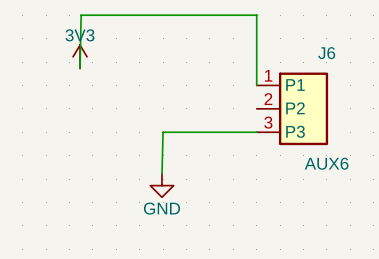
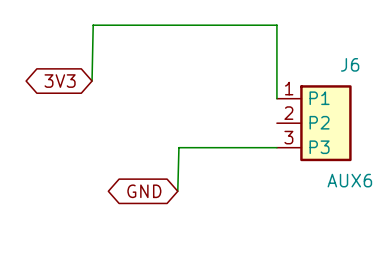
power symbol: 3V3 (80, 56) -> none
global label: none -> 3V3 (60, 81)
global label: none -> GND (144, 191)
power symbol: GND (161, 185) -> none

